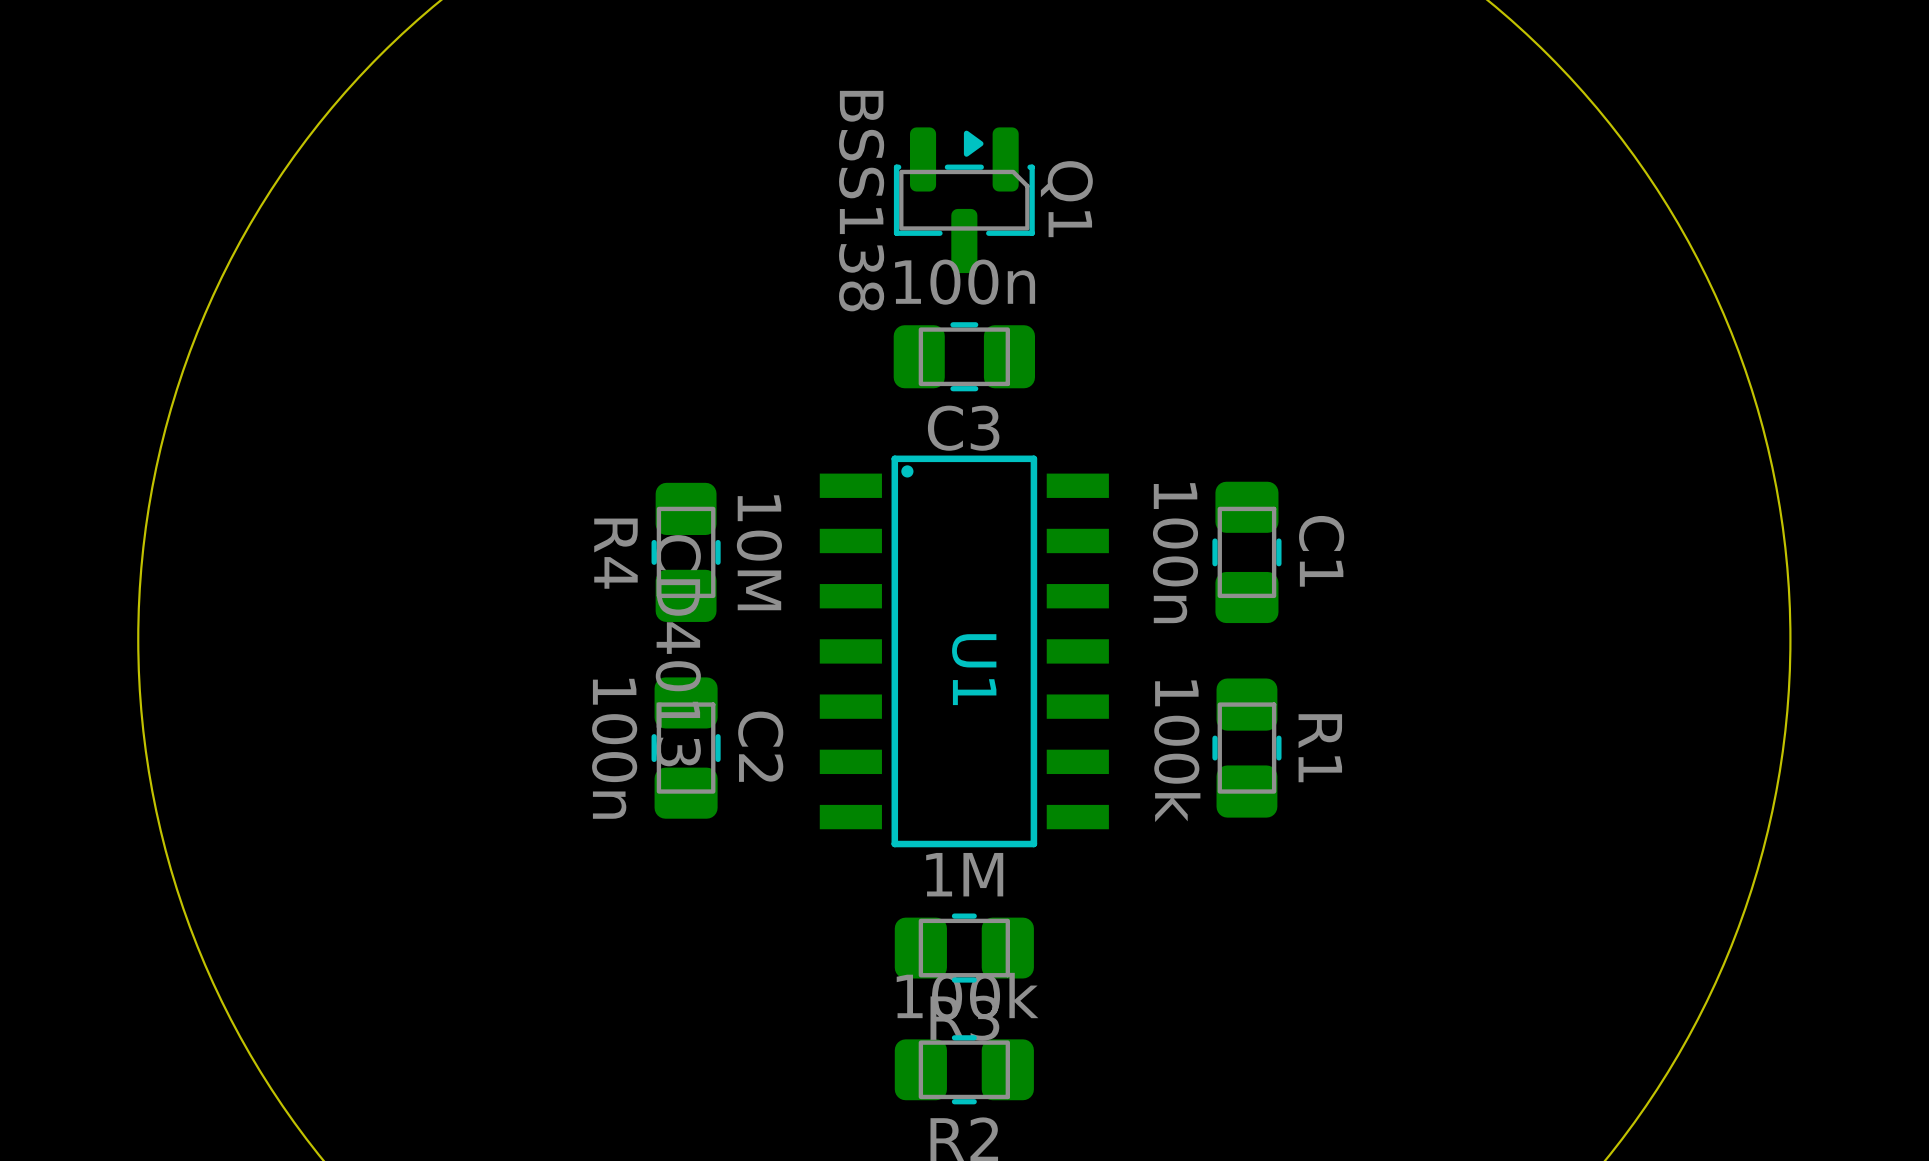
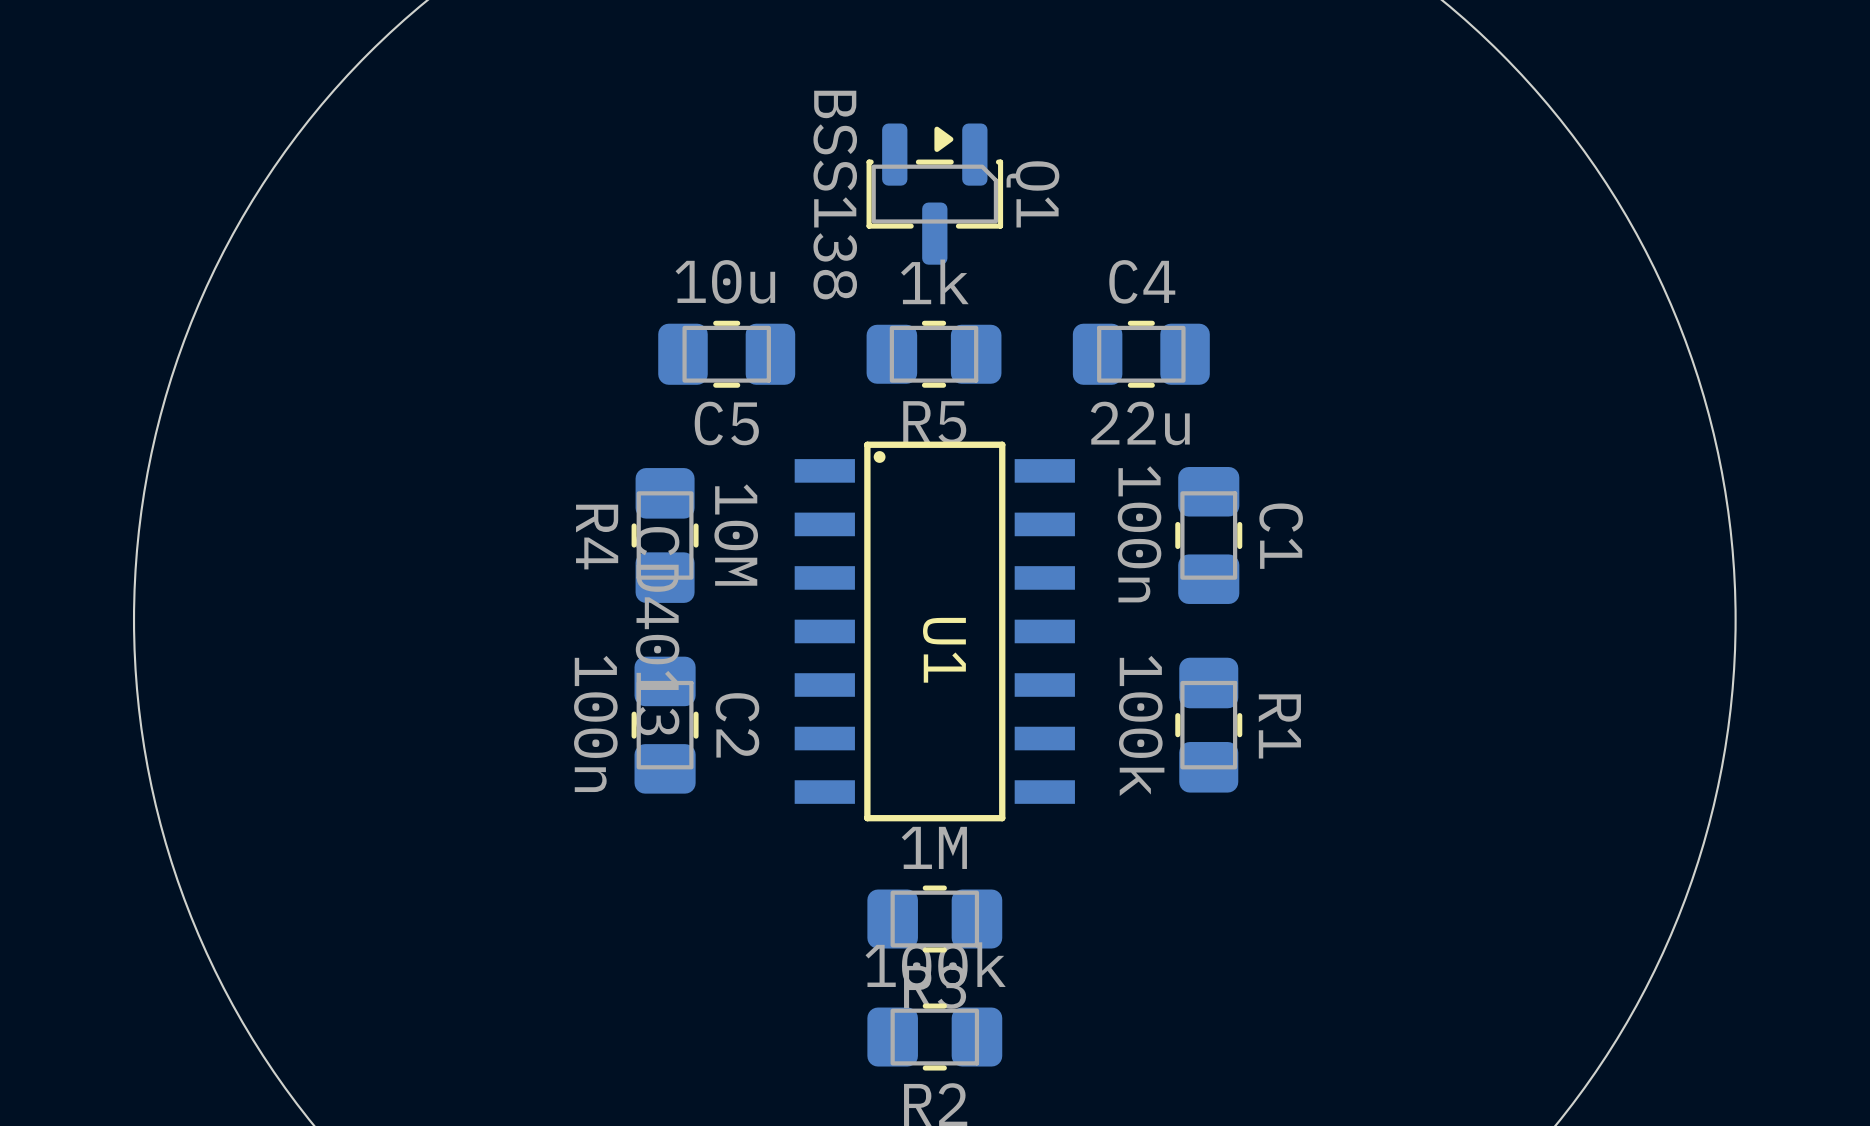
C3: 100n (964, 356) -> none
C5: none -> 10u (726, 354)
R5: none -> 1k (934, 354)
C4: none -> 22u (1141, 354)

